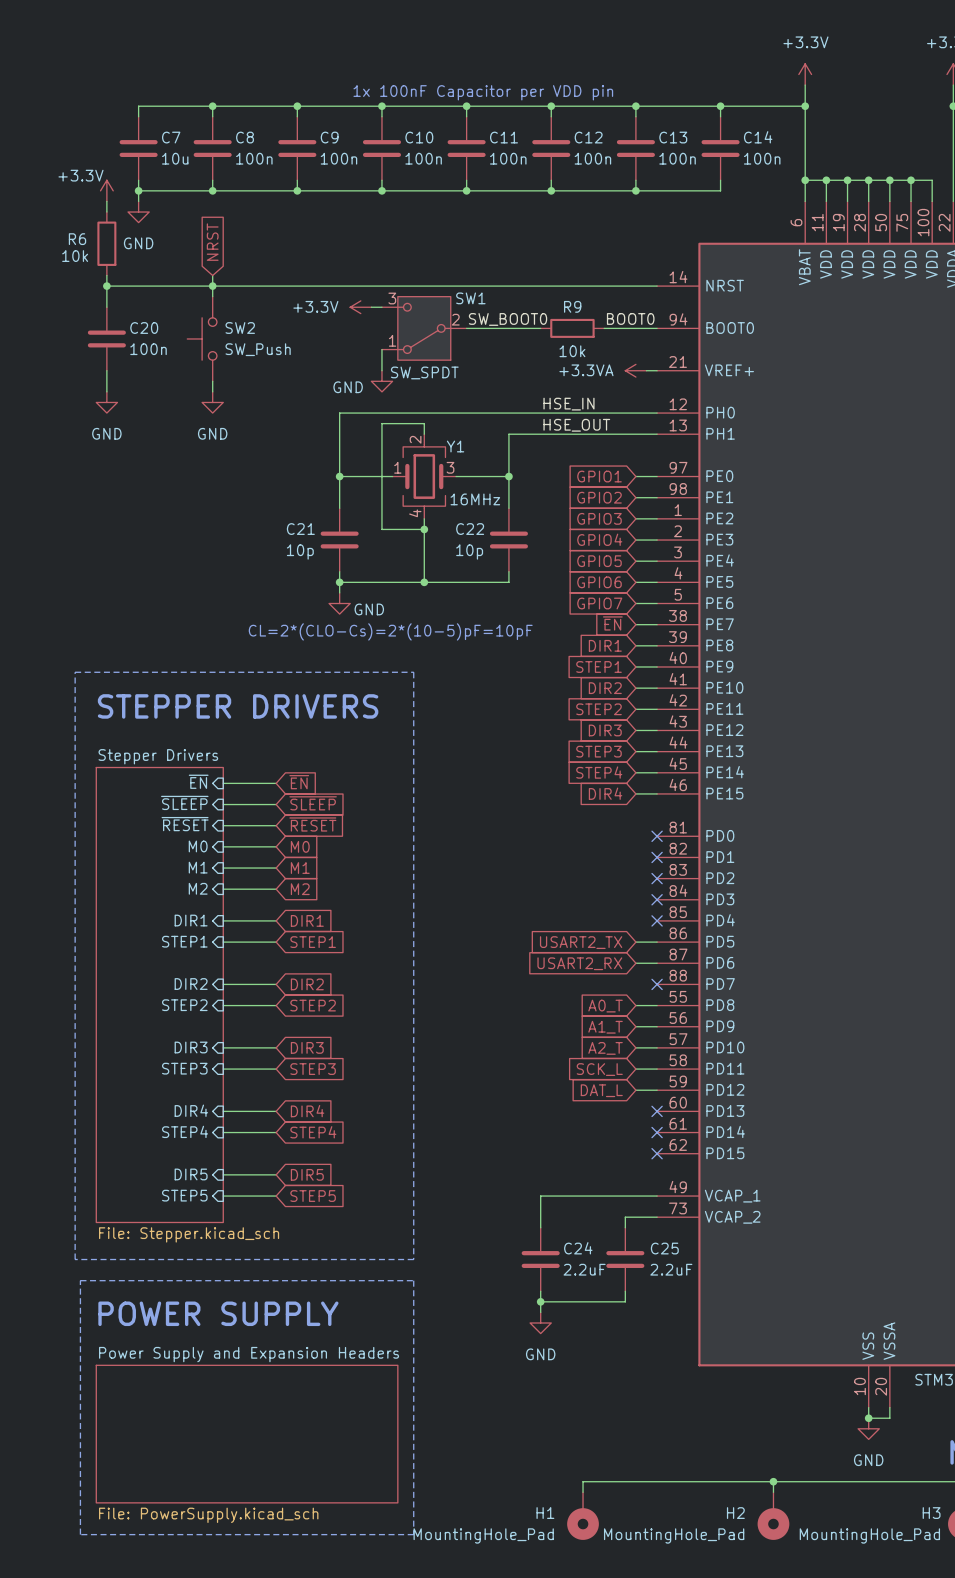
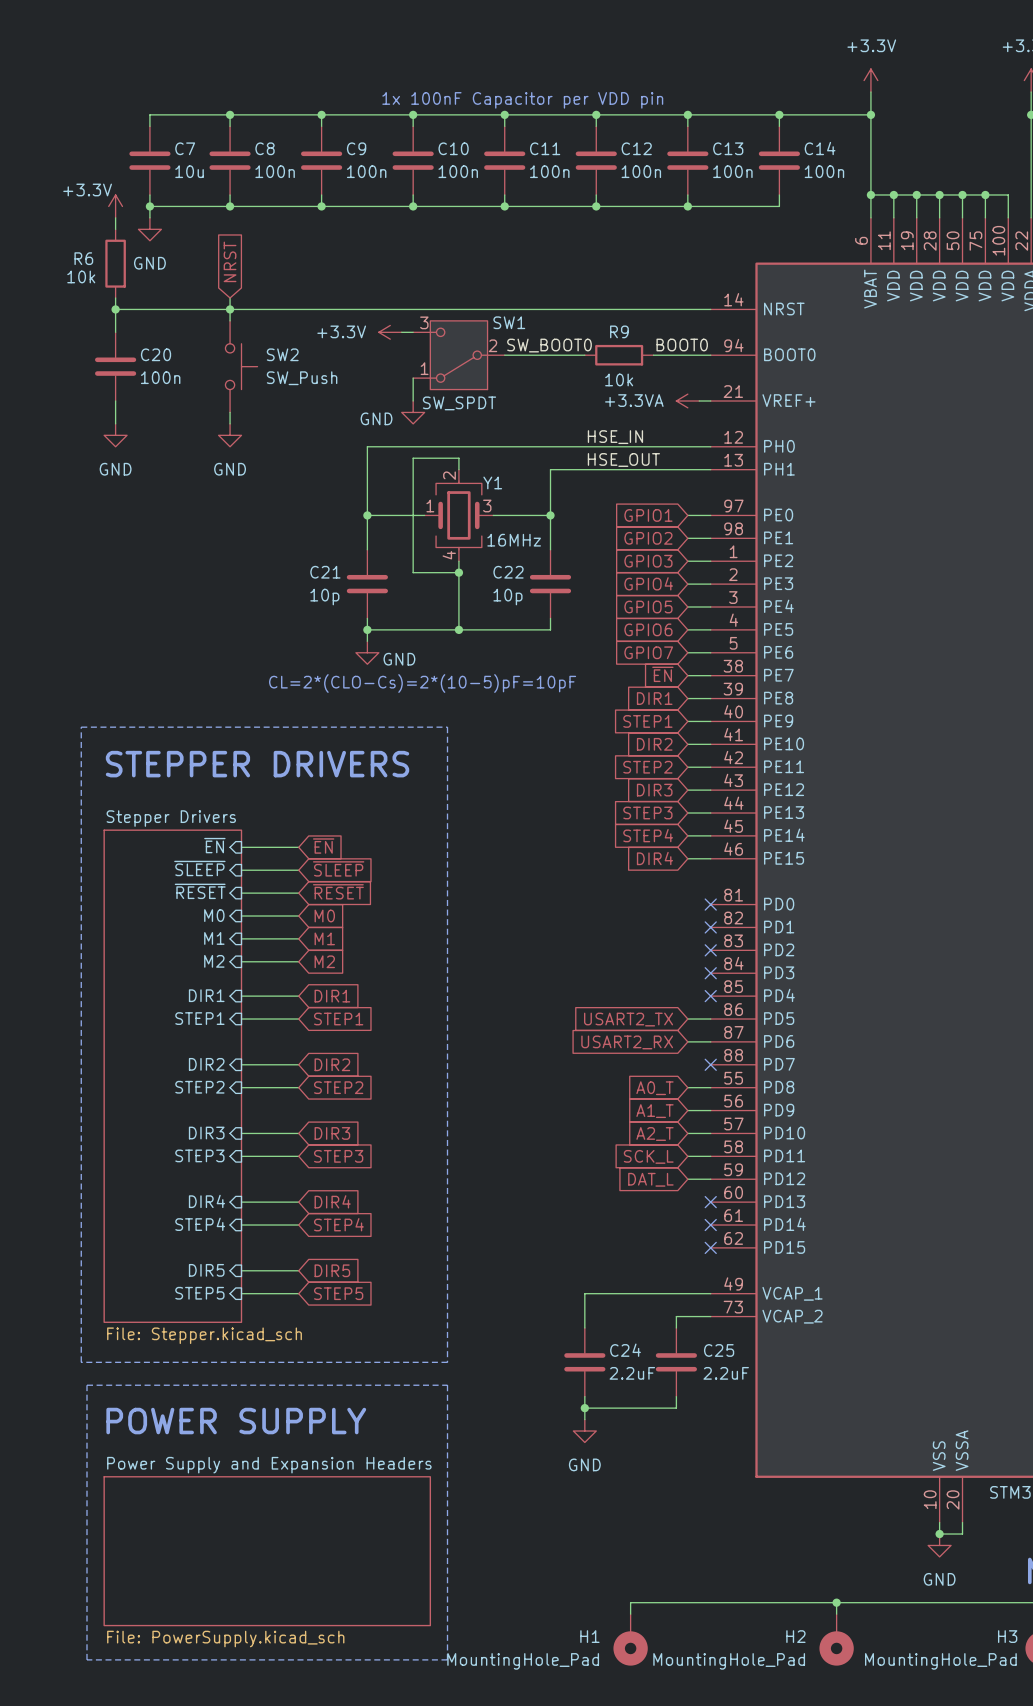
SW2 rotation: 0° (202, 338) -> 180° (241, 366)

